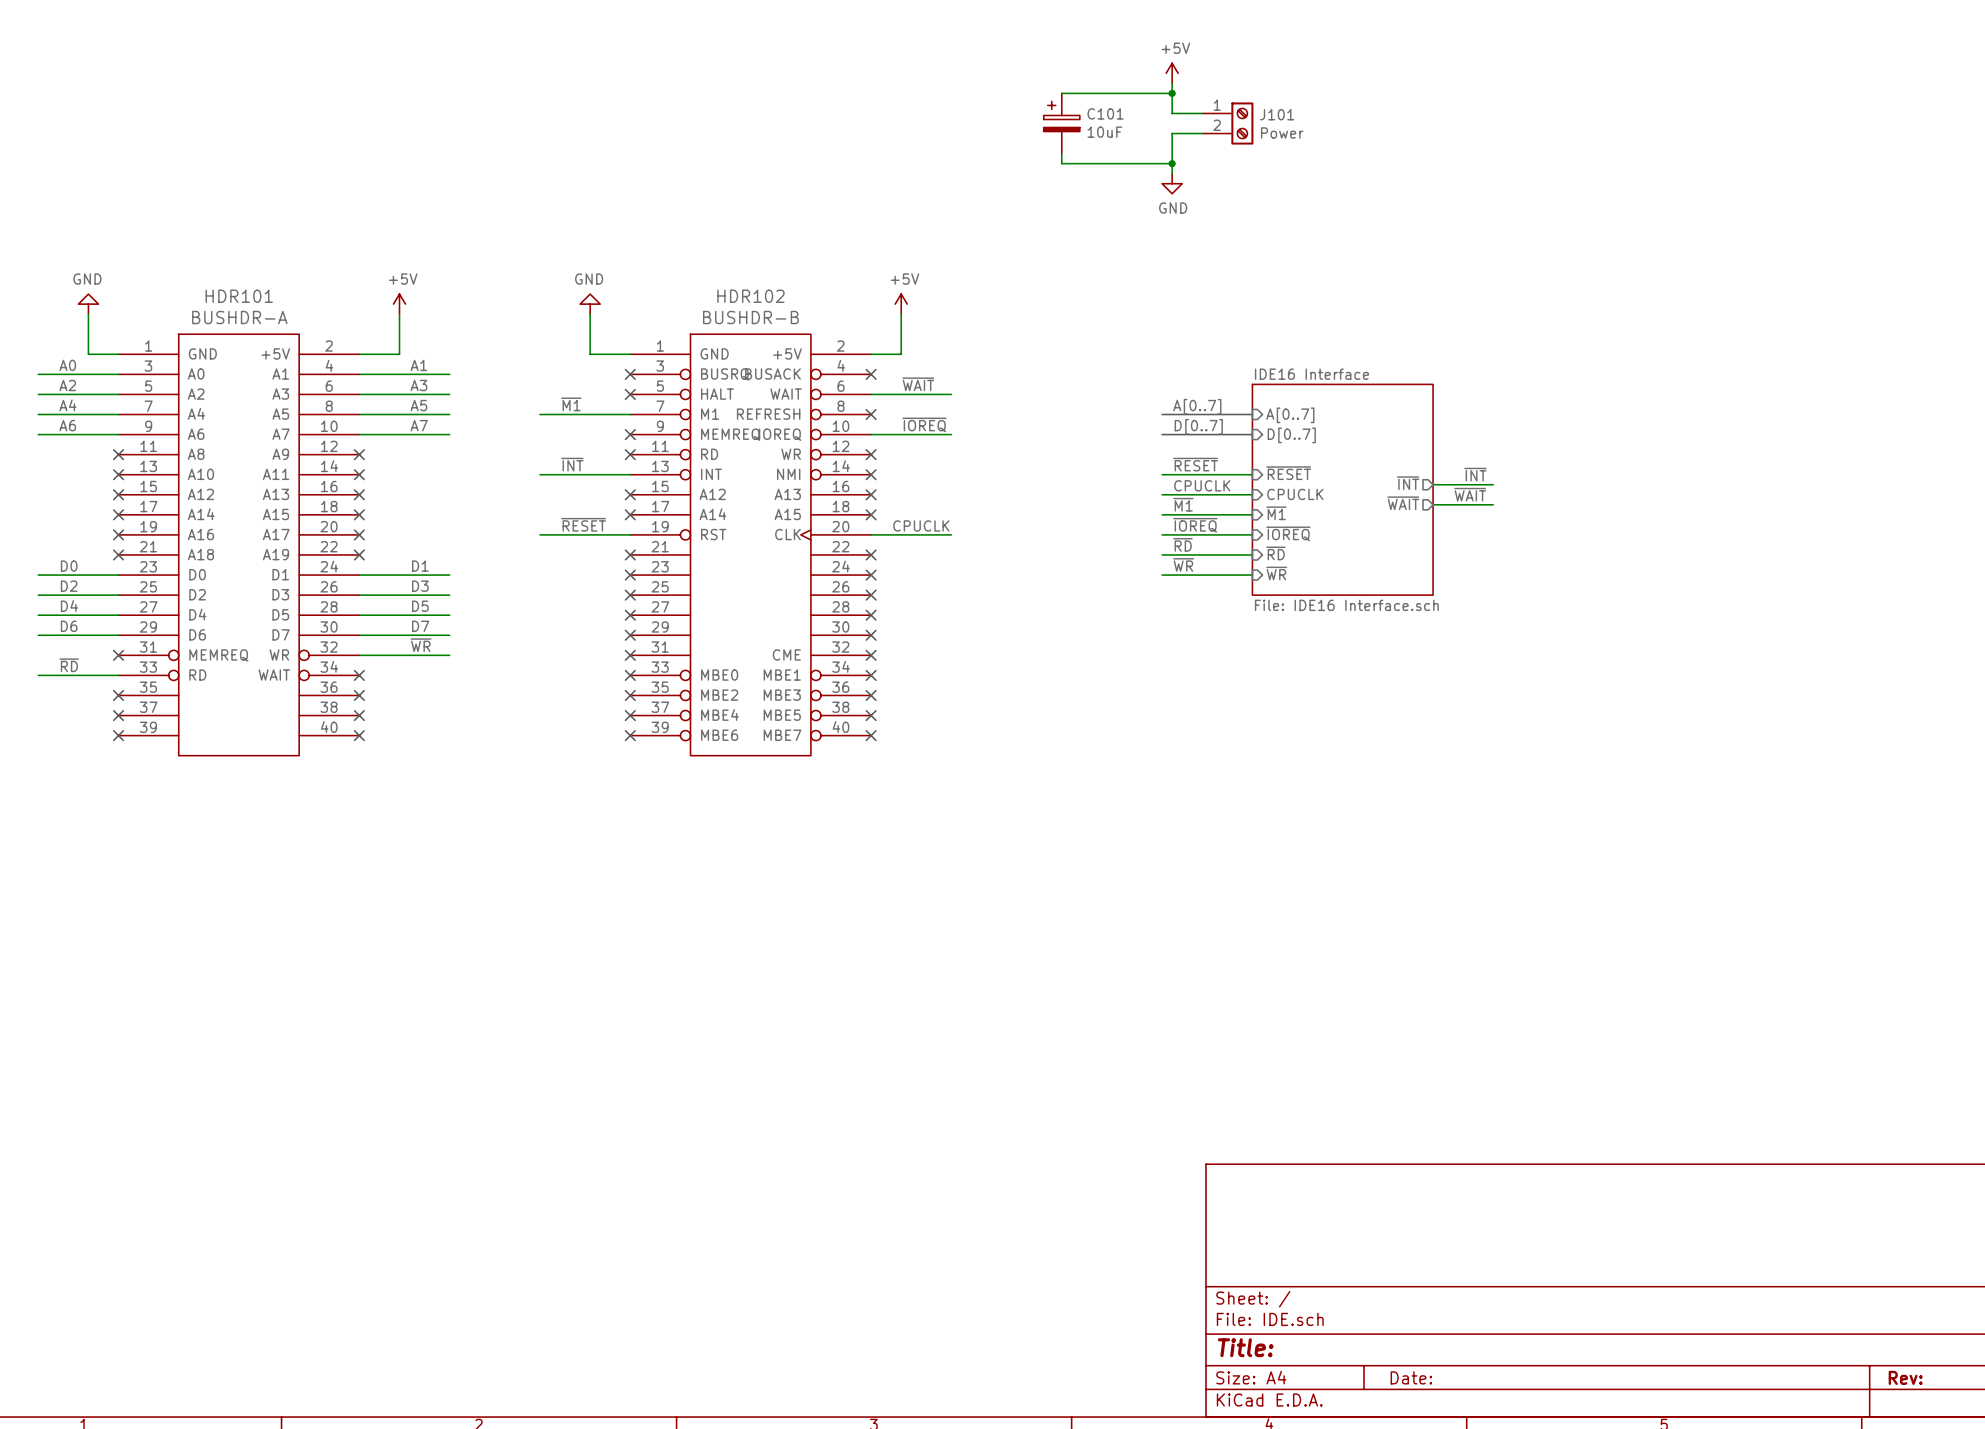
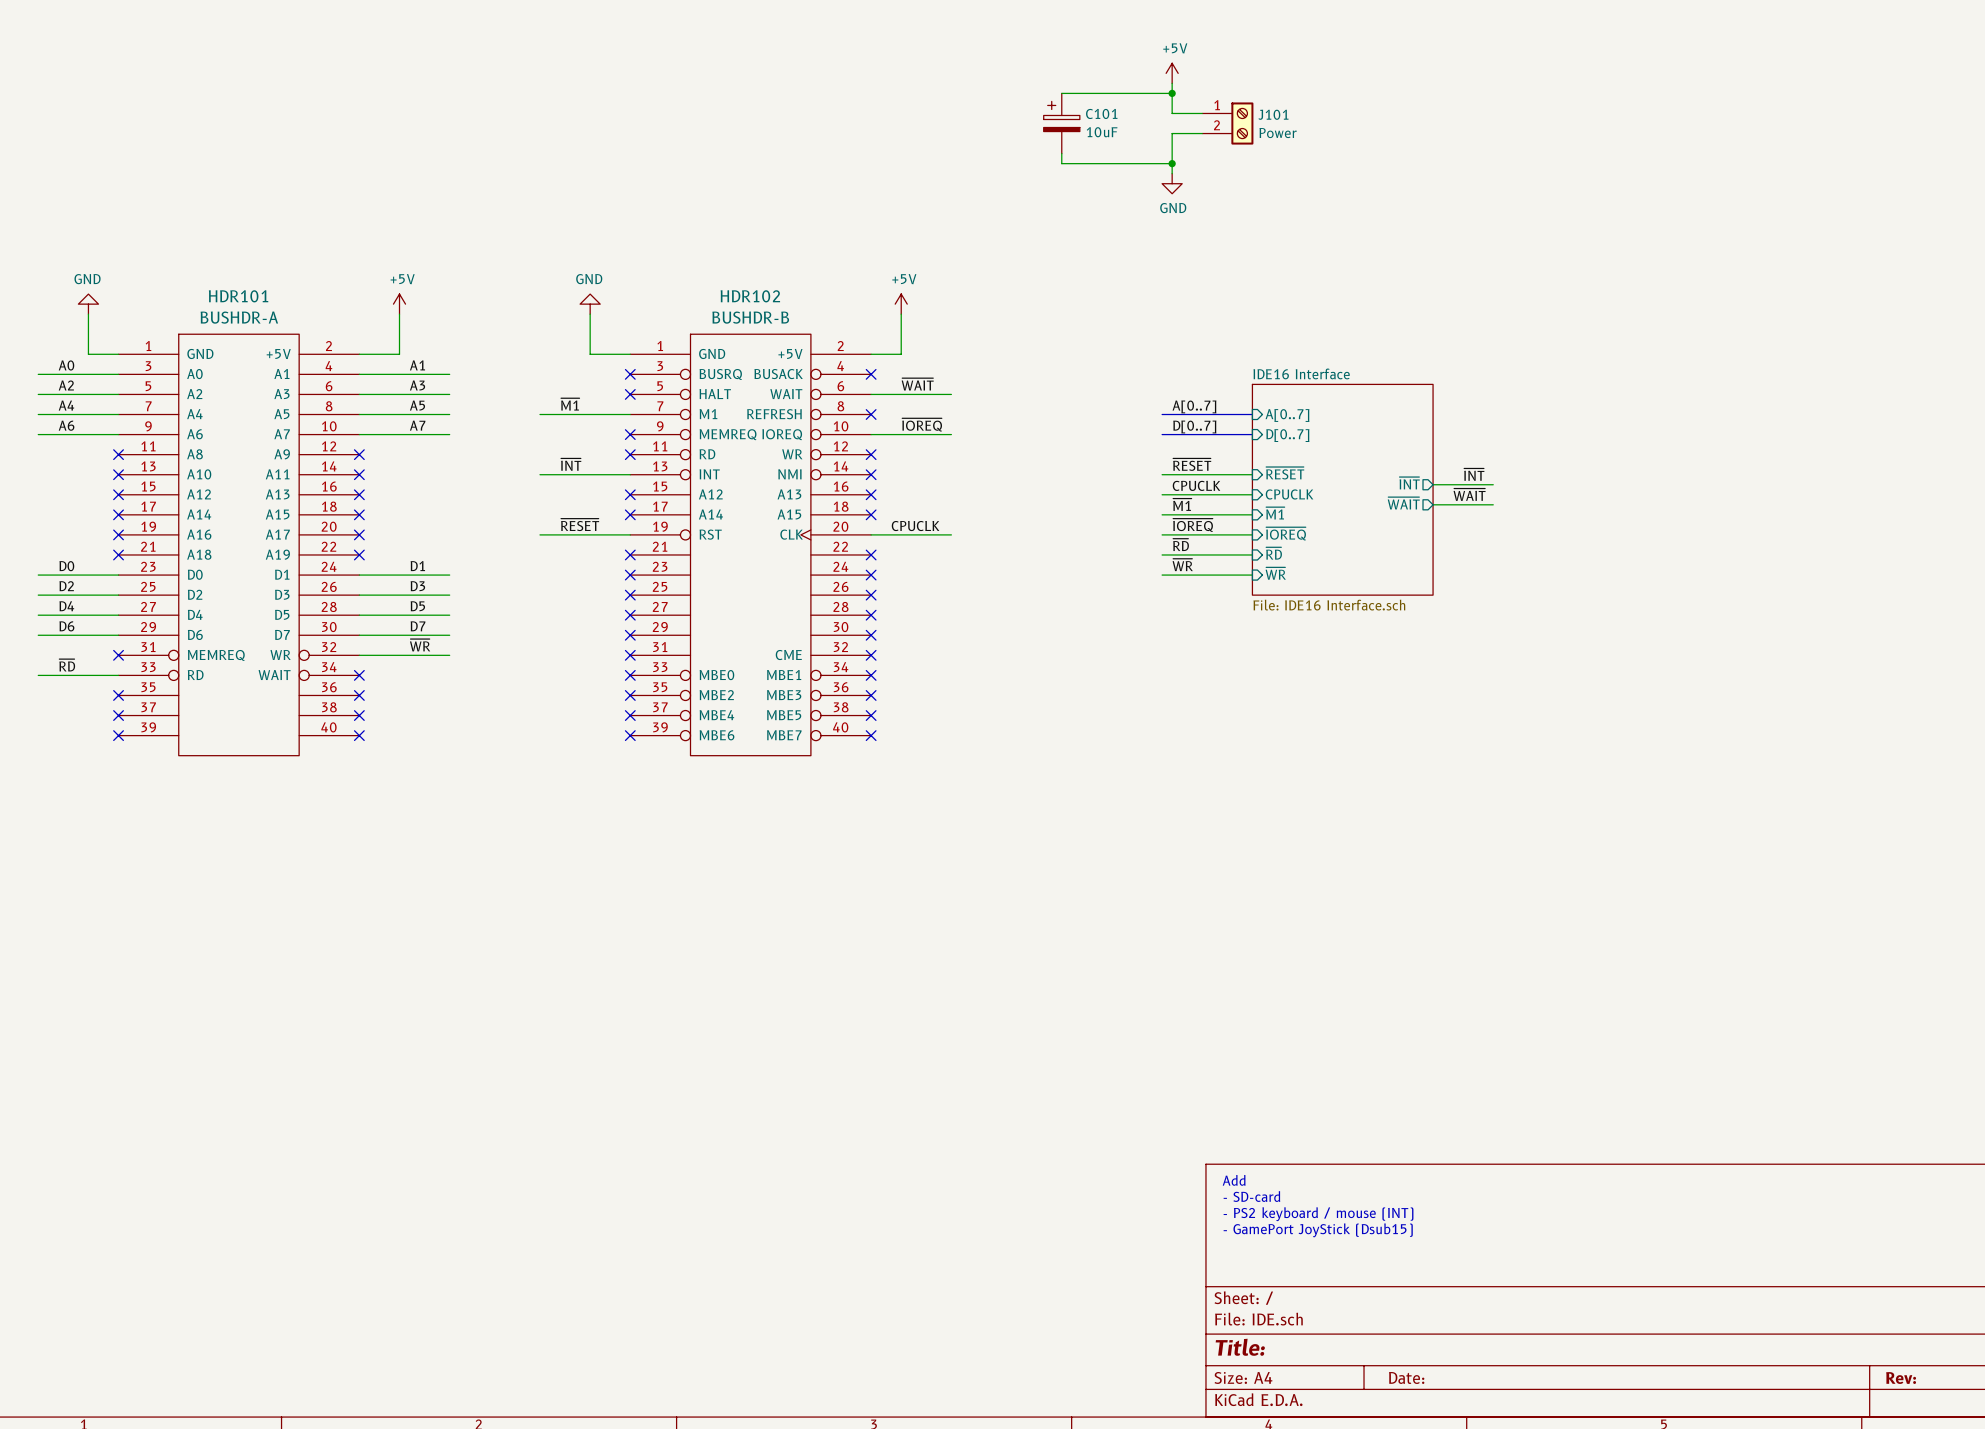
text: none -> Add (1234, 1180)
text: none -> - SD-card (1251, 1196)
text: none -> - PS2 keyboard / mouse (INT) (1318, 1214)
text: none -> - GamePort JoyStick (Dsub15) (1318, 1230)

